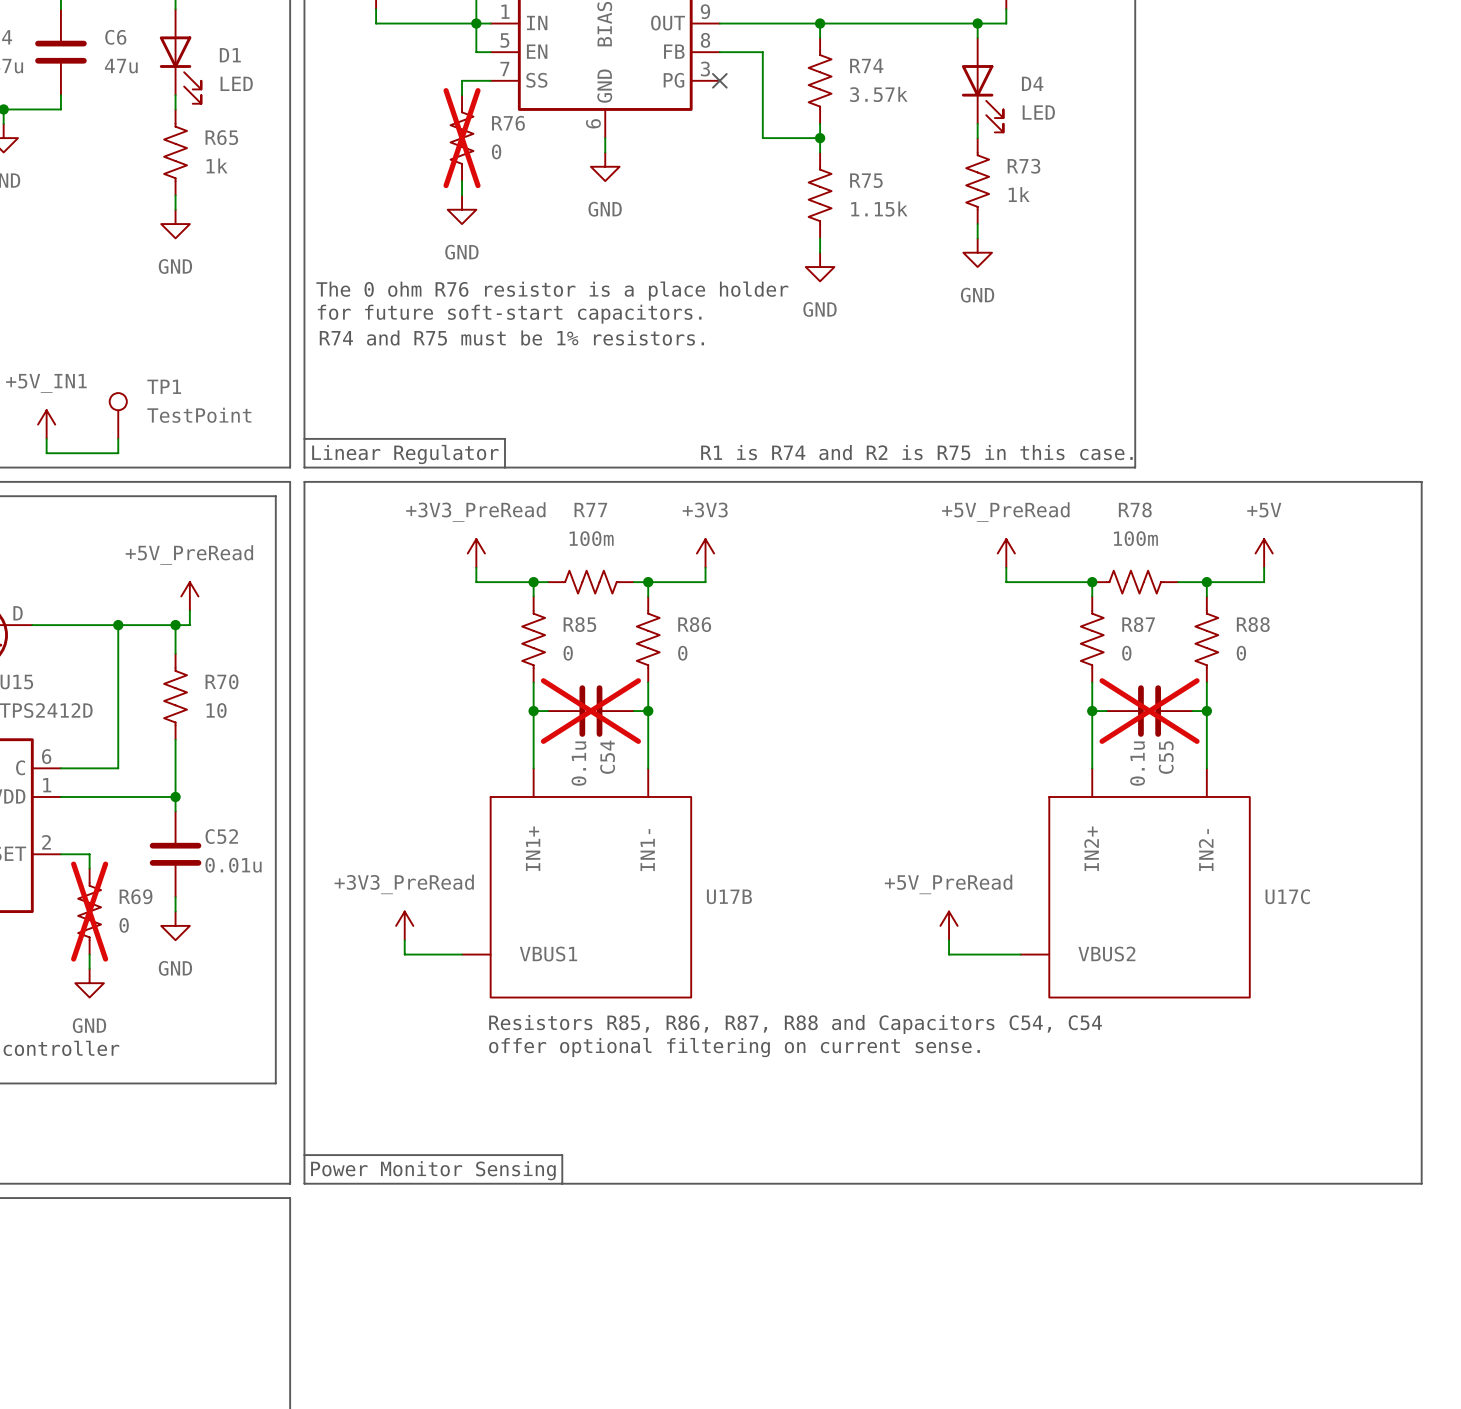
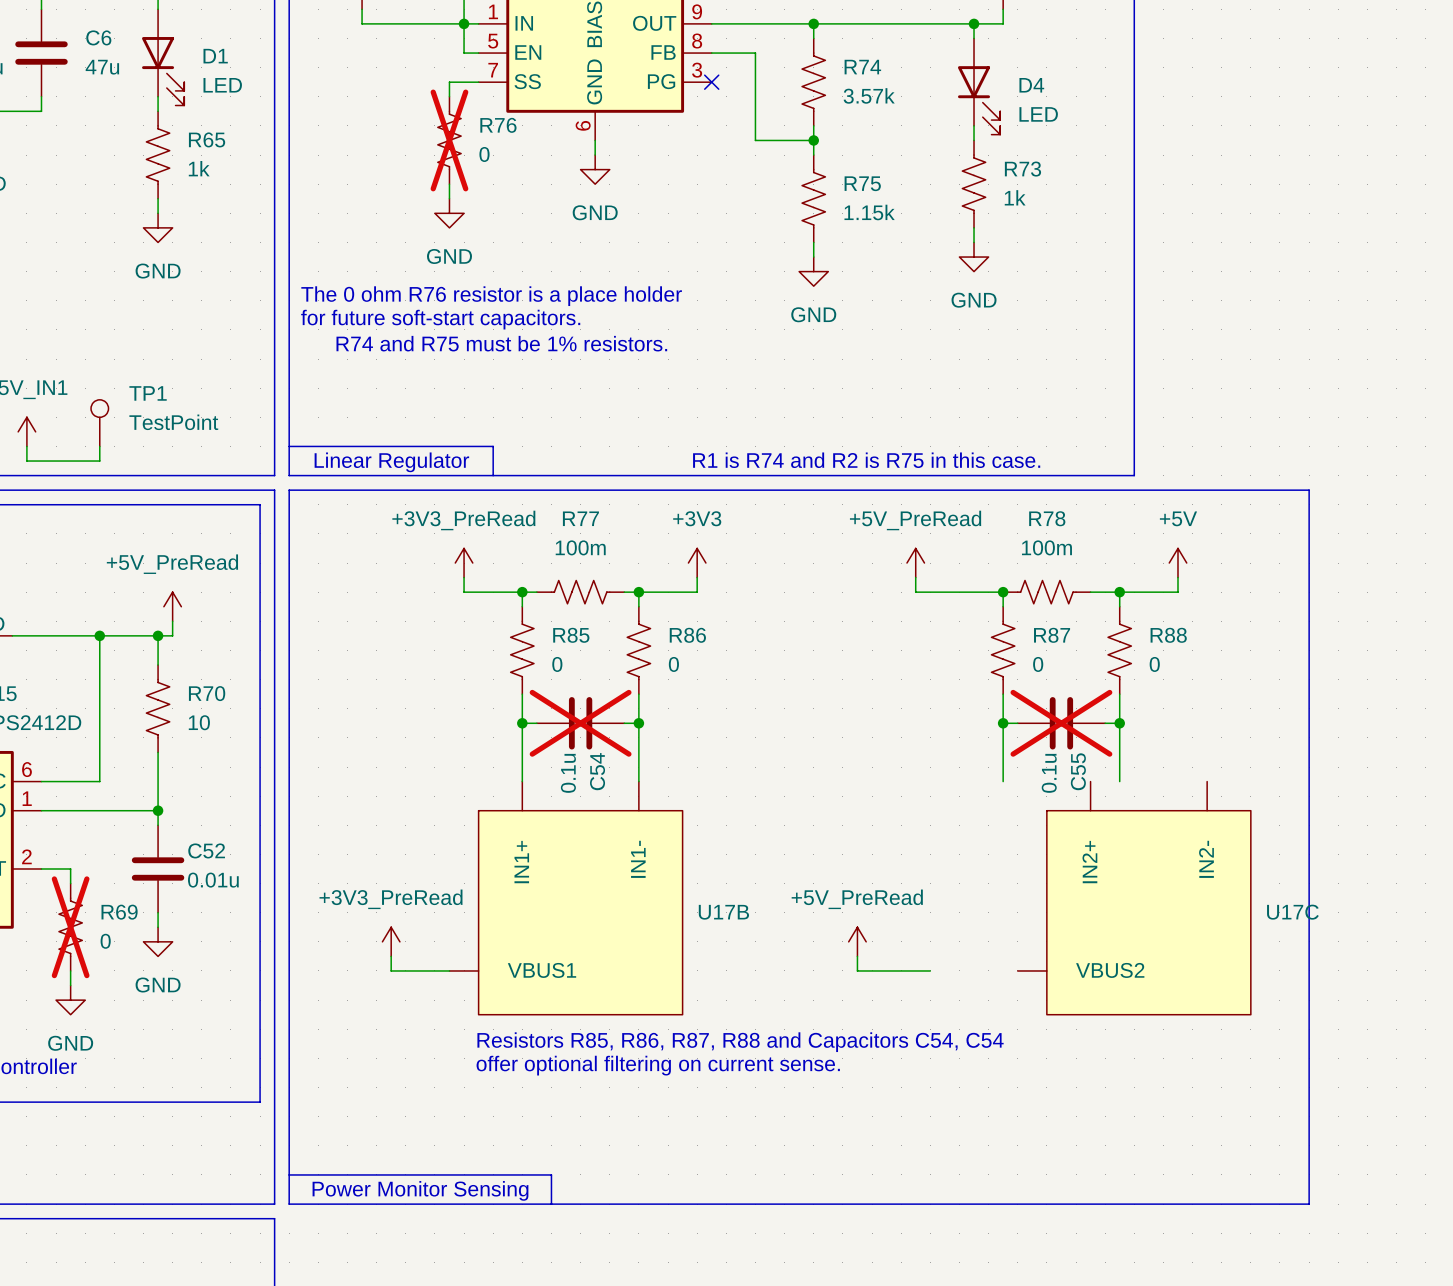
line: (1307, 481) (1421, 481) (1421, 1183) (1307, 1183) -> (1309, 490) (1309, 1204)
power symbol position: +5V_PreRead (1006, 553) -> +5V_PreRead (915, 563)
power symbol position: +5V (1264, 553) -> +5V (1177, 563)
wire: (1006, 567) (1006, 582) (1092, 582) (1092, 596) -> (915, 577) (915, 592) (1003, 592) (1003, 606)
wire: (1264, 567) (1264, 582) (1178, 582) -> (1177, 577) (1177, 592) (1090, 592)
junction: none -> (1003, 592)
junction position: (1092, 582) -> (1119, 592)
R78 position: (1135, 582) -> (1046, 592)
wire: (1206, 582) (1206, 596) -> (1119, 592) (1119, 606)
junction: (1206, 582) -> none
R87 position: (1092, 639) -> (1003, 650)
R88 position: (1206, 639) -> (1119, 650)
wire: (1092, 682) (1092, 768) -> (1003, 694) (1003, 781)
wire: (1206, 682) (1206, 768) -> (1119, 694) (1119, 781)
junction: none -> (1003, 723)
junction position: (1092, 711) -> (1119, 723)
C55 position: (1149, 711) -> (1061, 723)
wire: (1192, 711) (1206, 711) -> (1003, 723) (1017, 723)
junction: (1206, 711) -> none
power symbol position: +5V_PreRead (949, 925) -> +5V_PreRead (857, 941)
wire: (949, 940) (949, 954) (1020, 954) -> (857, 956) (857, 970) (930, 970)

